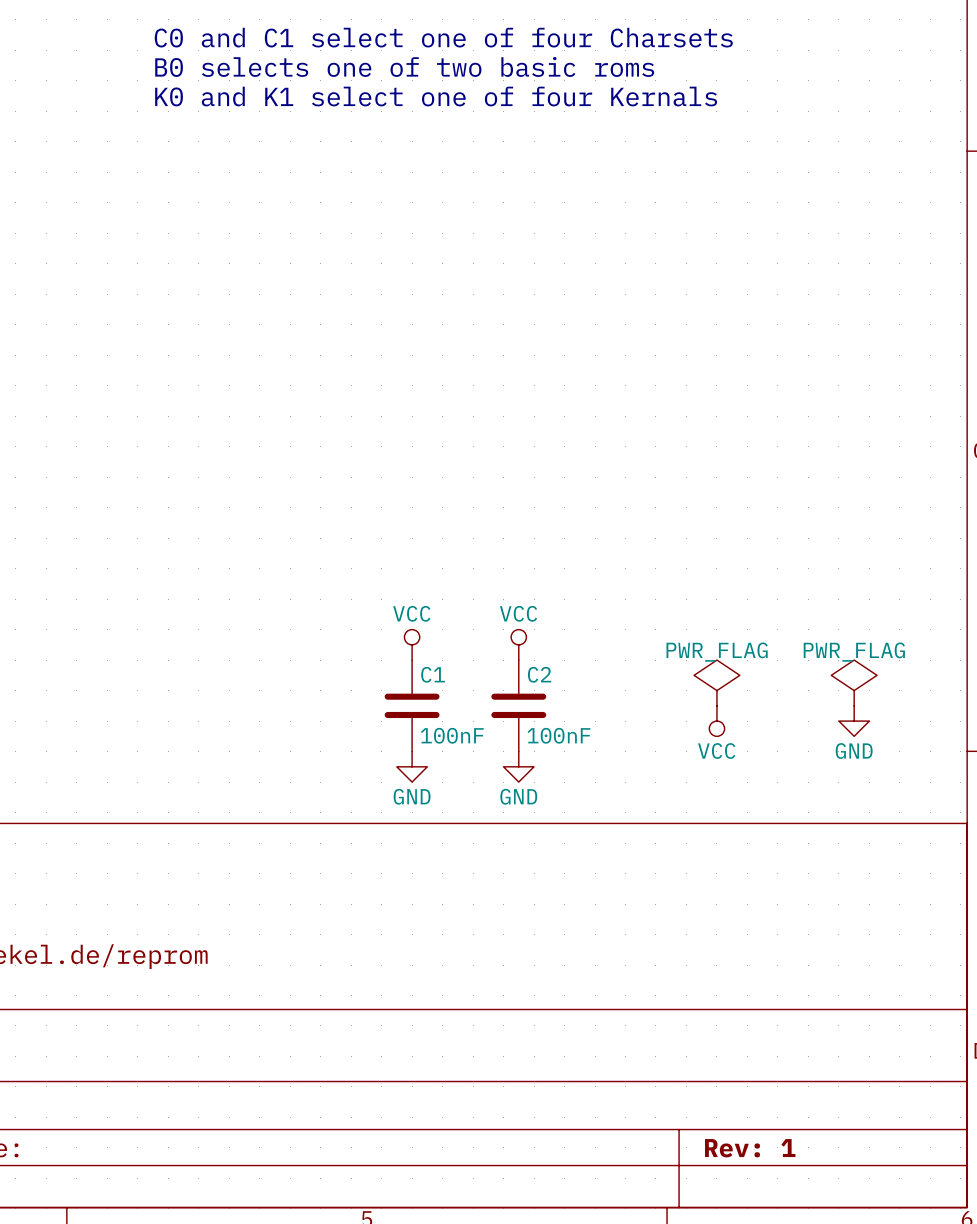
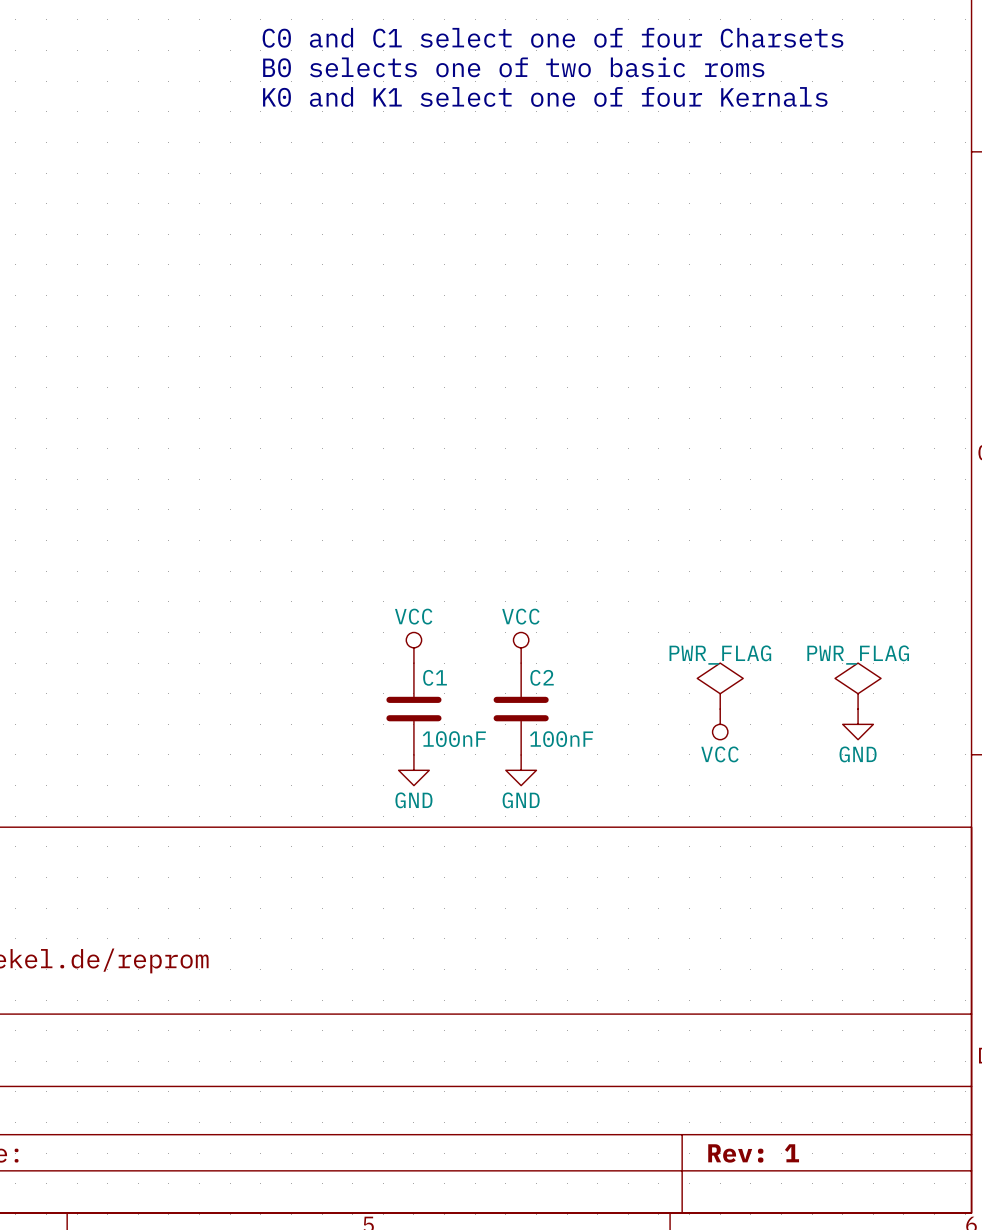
text position: C0 and C1 select one of four Charsets (443, 37) -> C0 and C1 select one of four Charsets (552, 37)
text position: B0 selects one of two basic roms (404, 66) -> B0 selects one of two basic roms (513, 67)
text position: K0 and K1 select one of four Kernals (436, 96) -> K0 and K1 select one of four Kernals (545, 96)

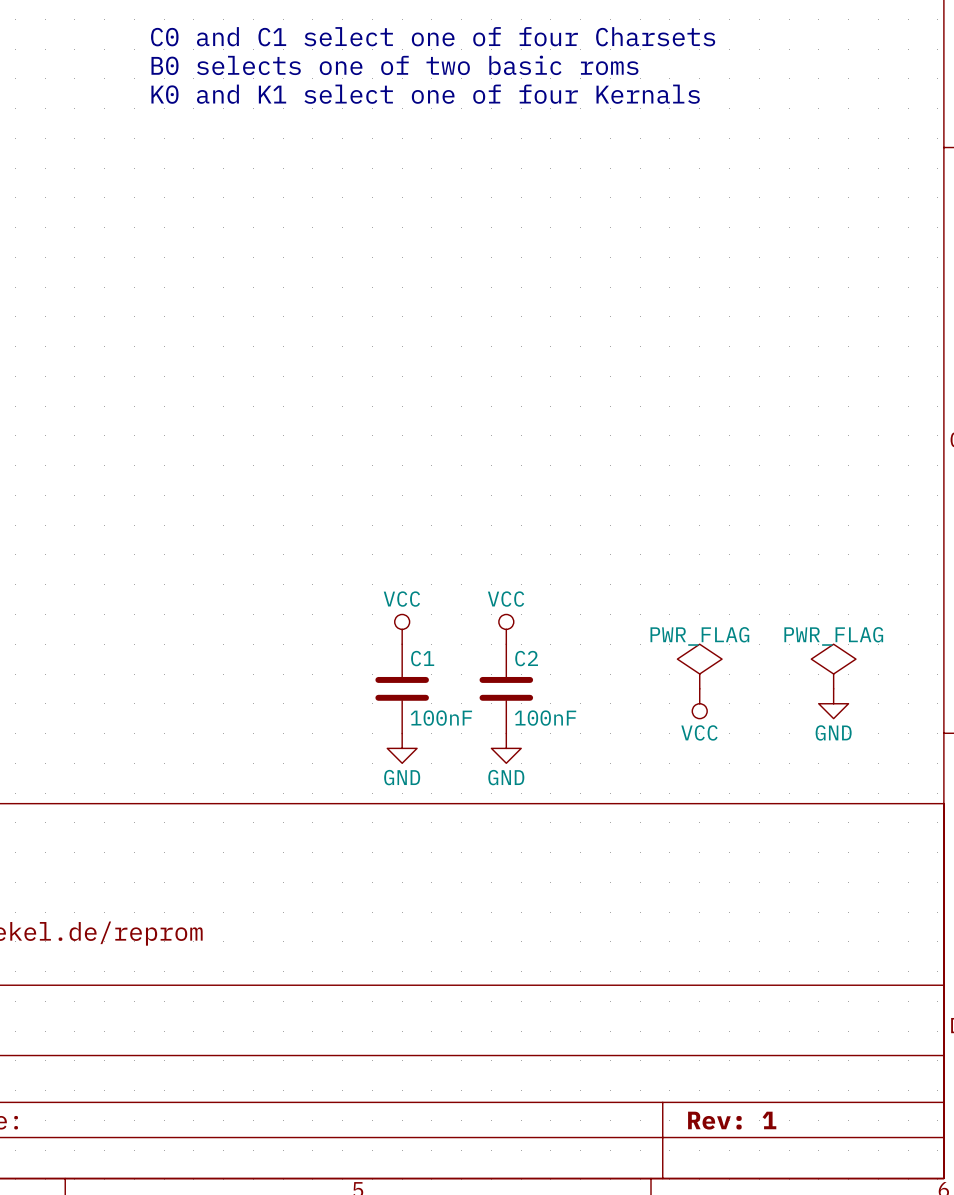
text position: C0 and C1 select one of four Charsets (552, 37) -> C0 and C1 select one of four Charsets (433, 36)
text position: B0 selects one of two basic roms (513, 67) -> B0 selects one of two basic roms (394, 65)
text position: K0 and K1 select one of four Kernals (545, 96) -> K0 and K1 select one of four Kernals (425, 94)

